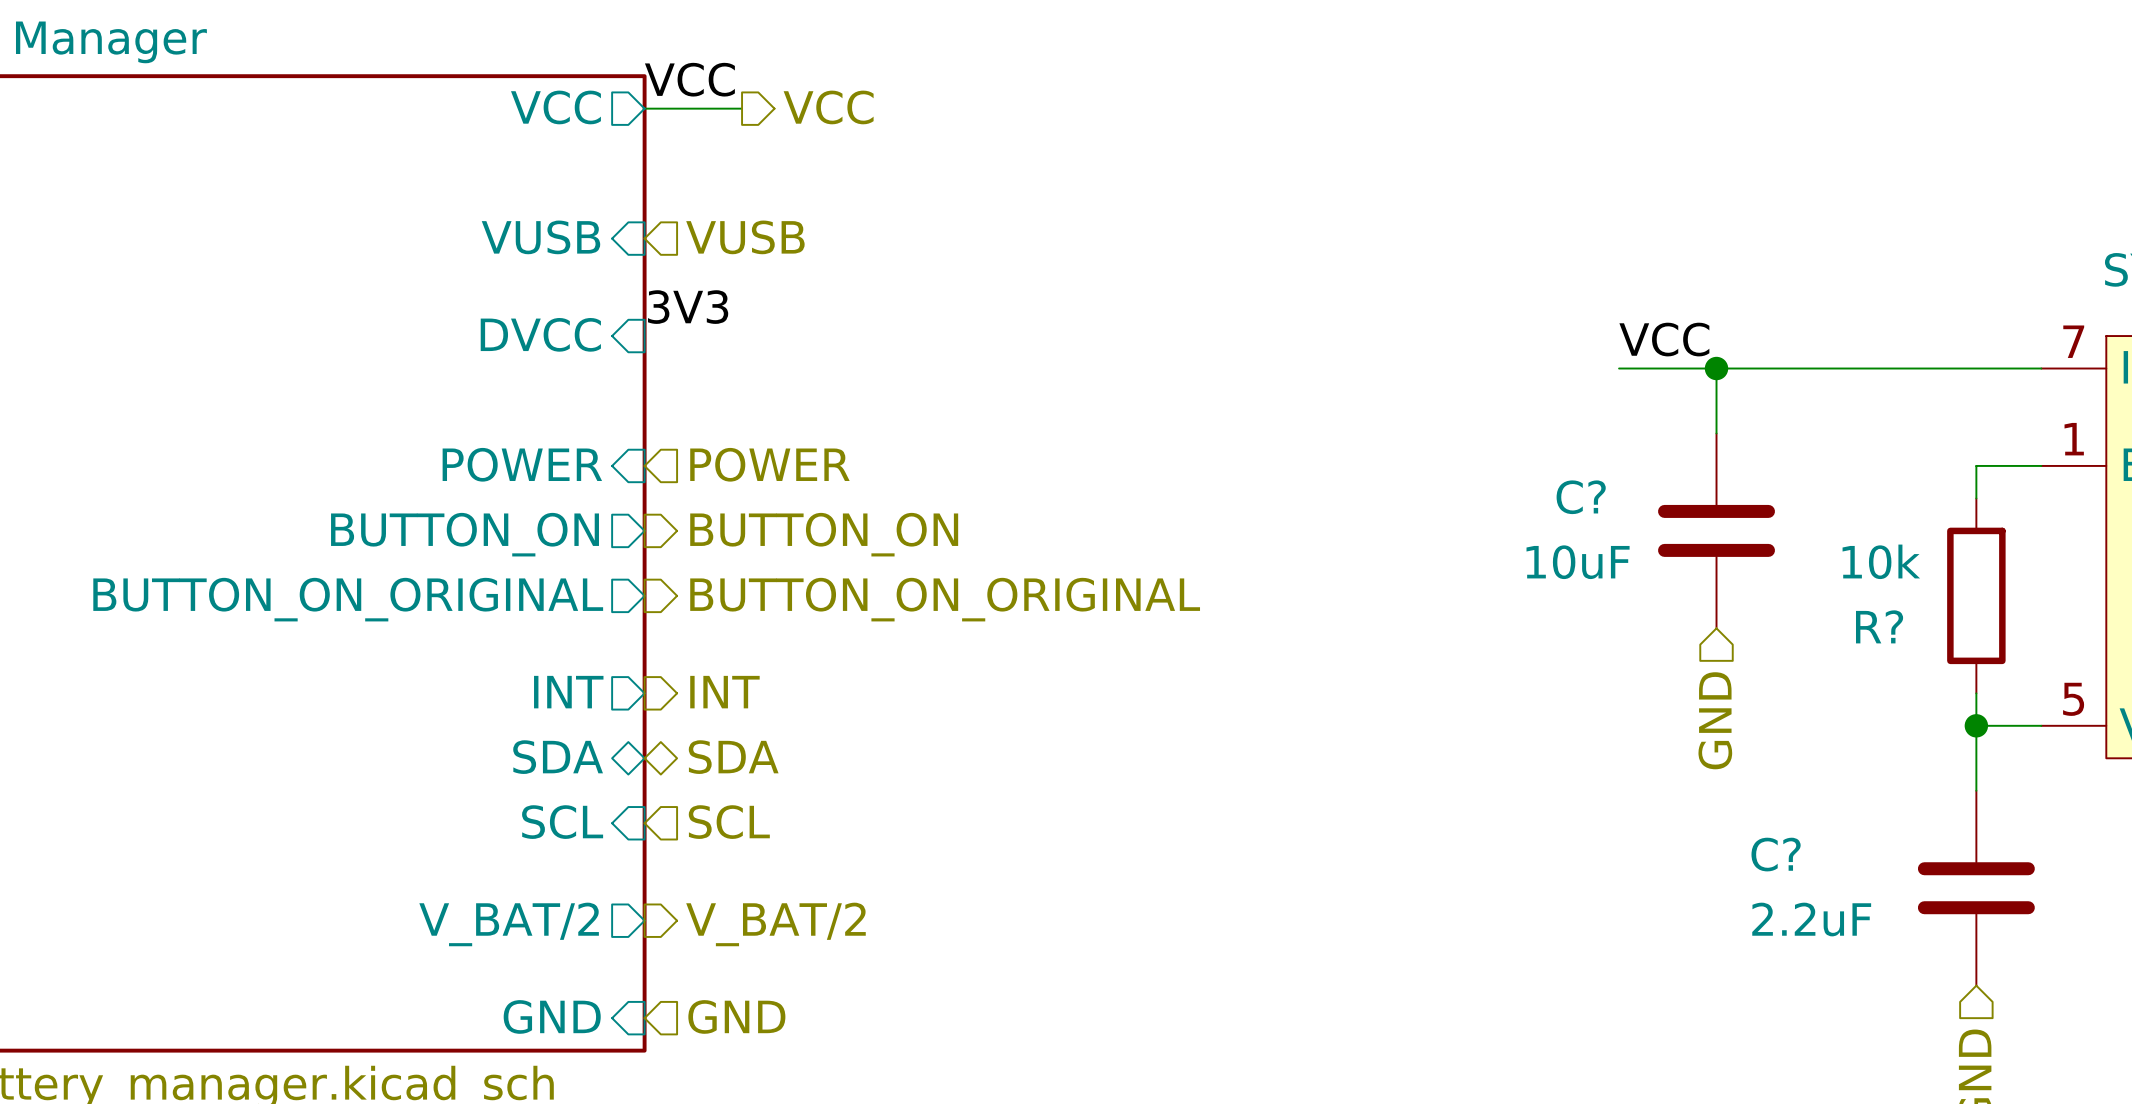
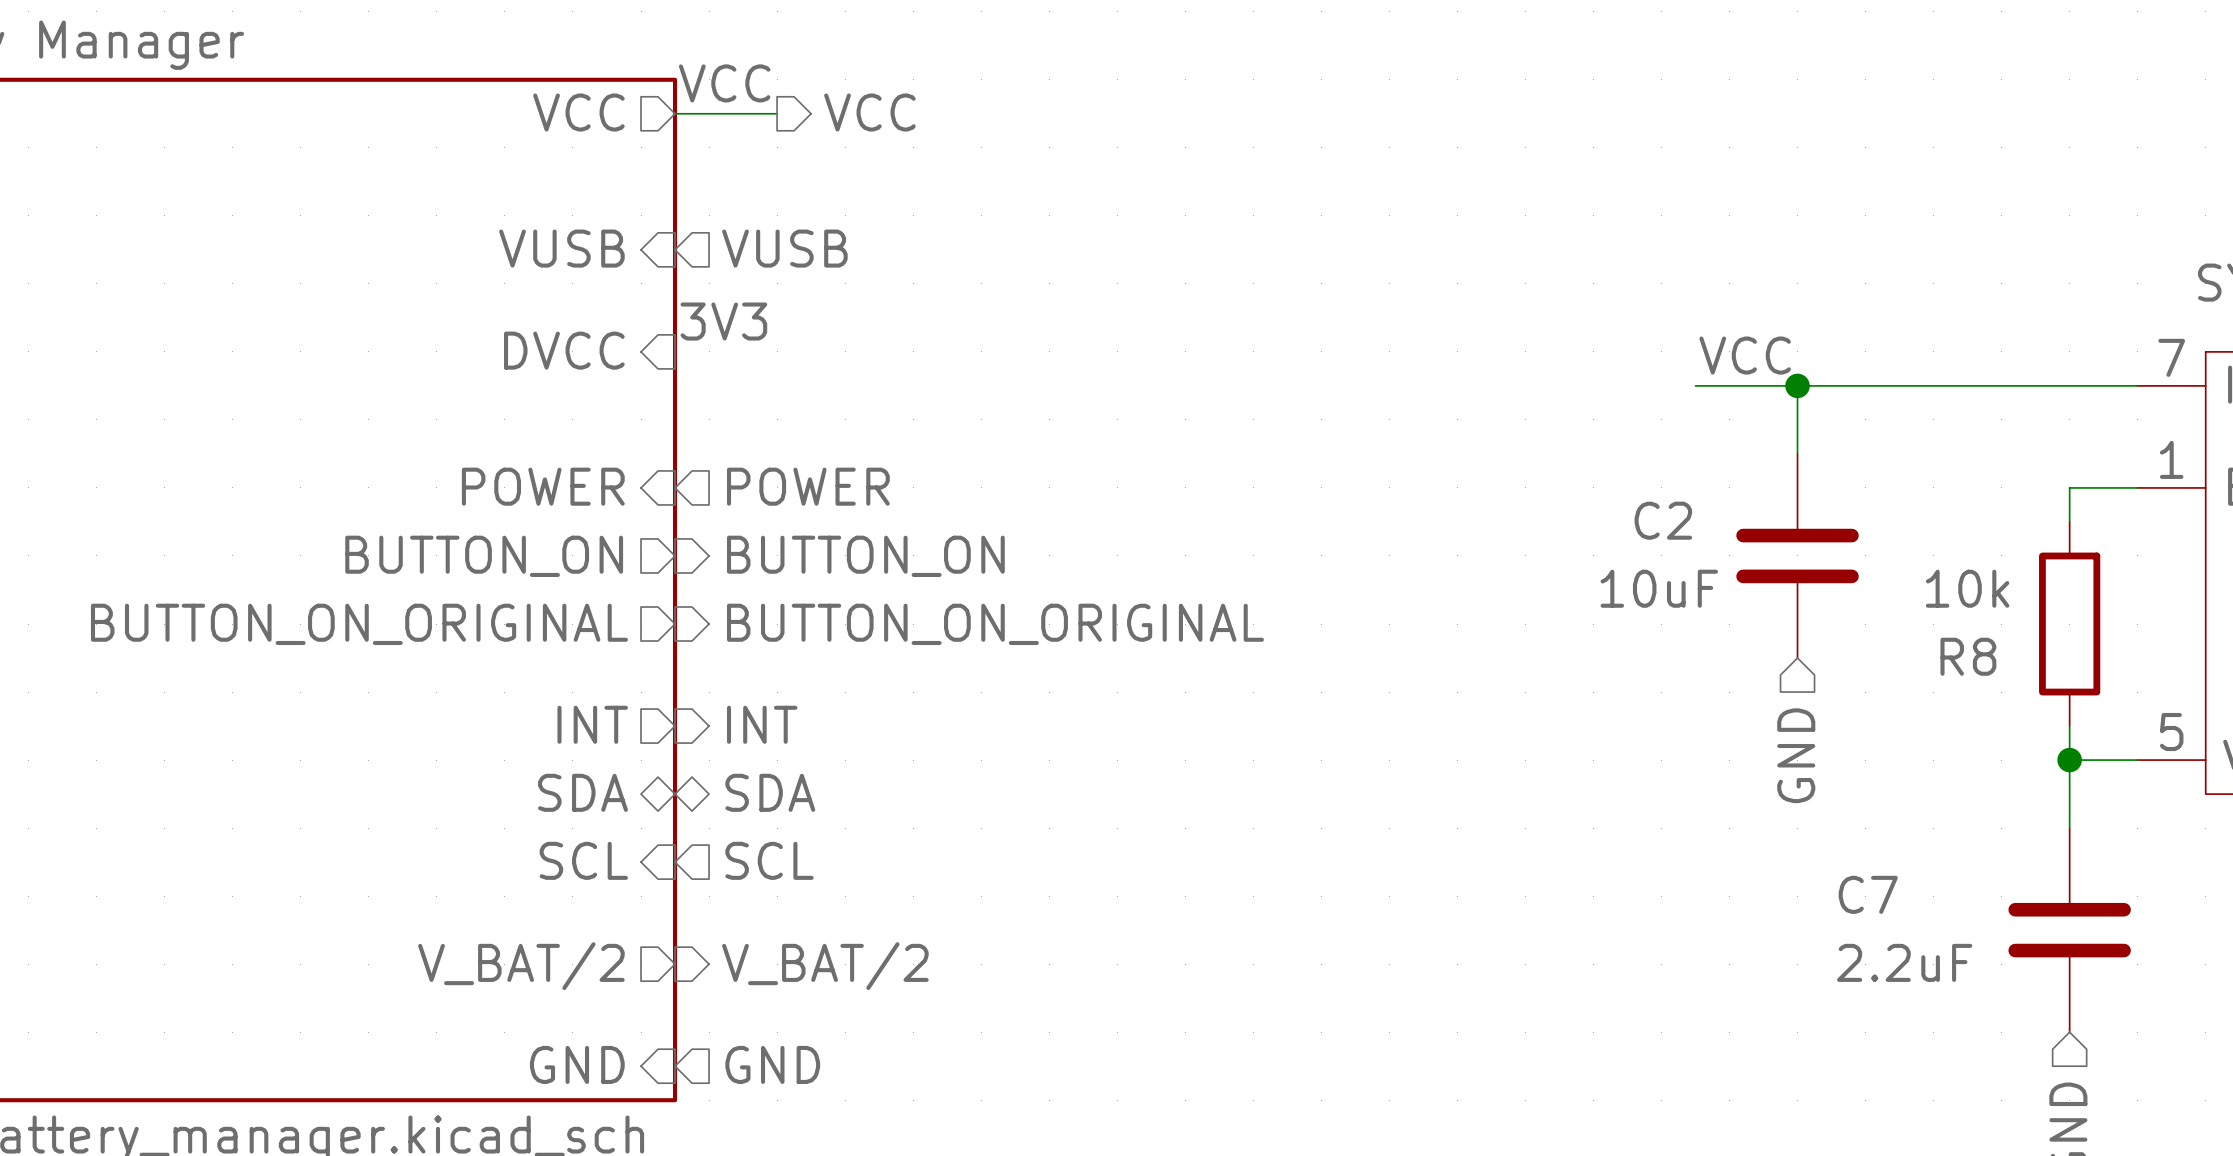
C? name: C? (1581, 497) -> C2 (1663, 520)
R? name: R? (1879, 626) -> R8 (1968, 656)
C? name: C? (1776, 854) -> C7 (1868, 894)

